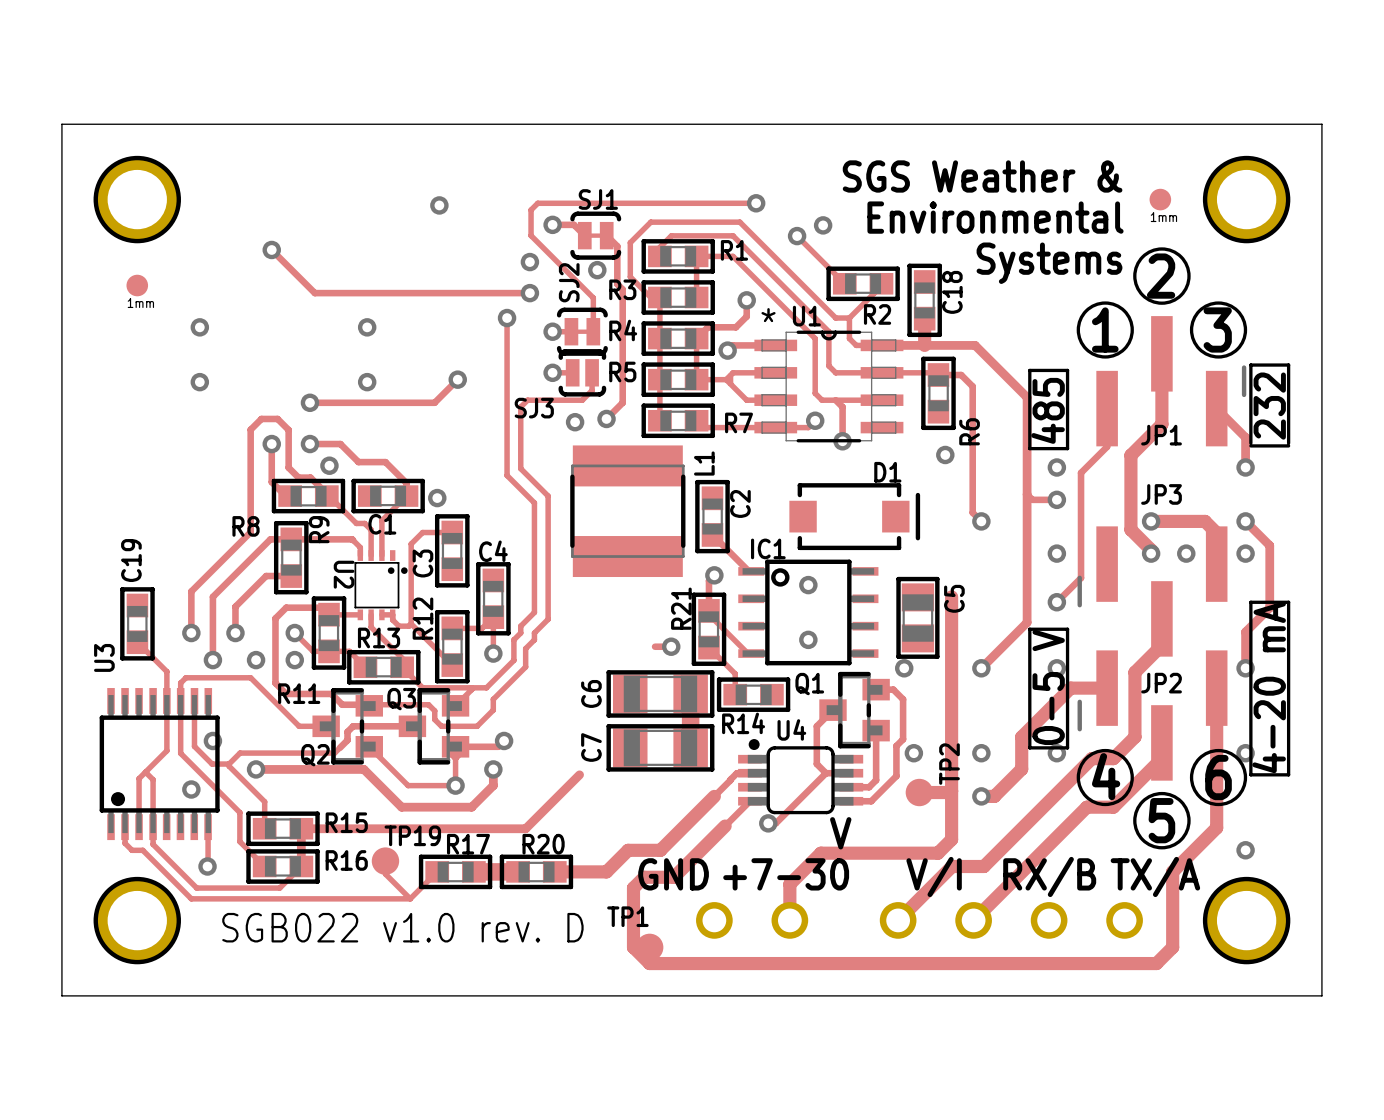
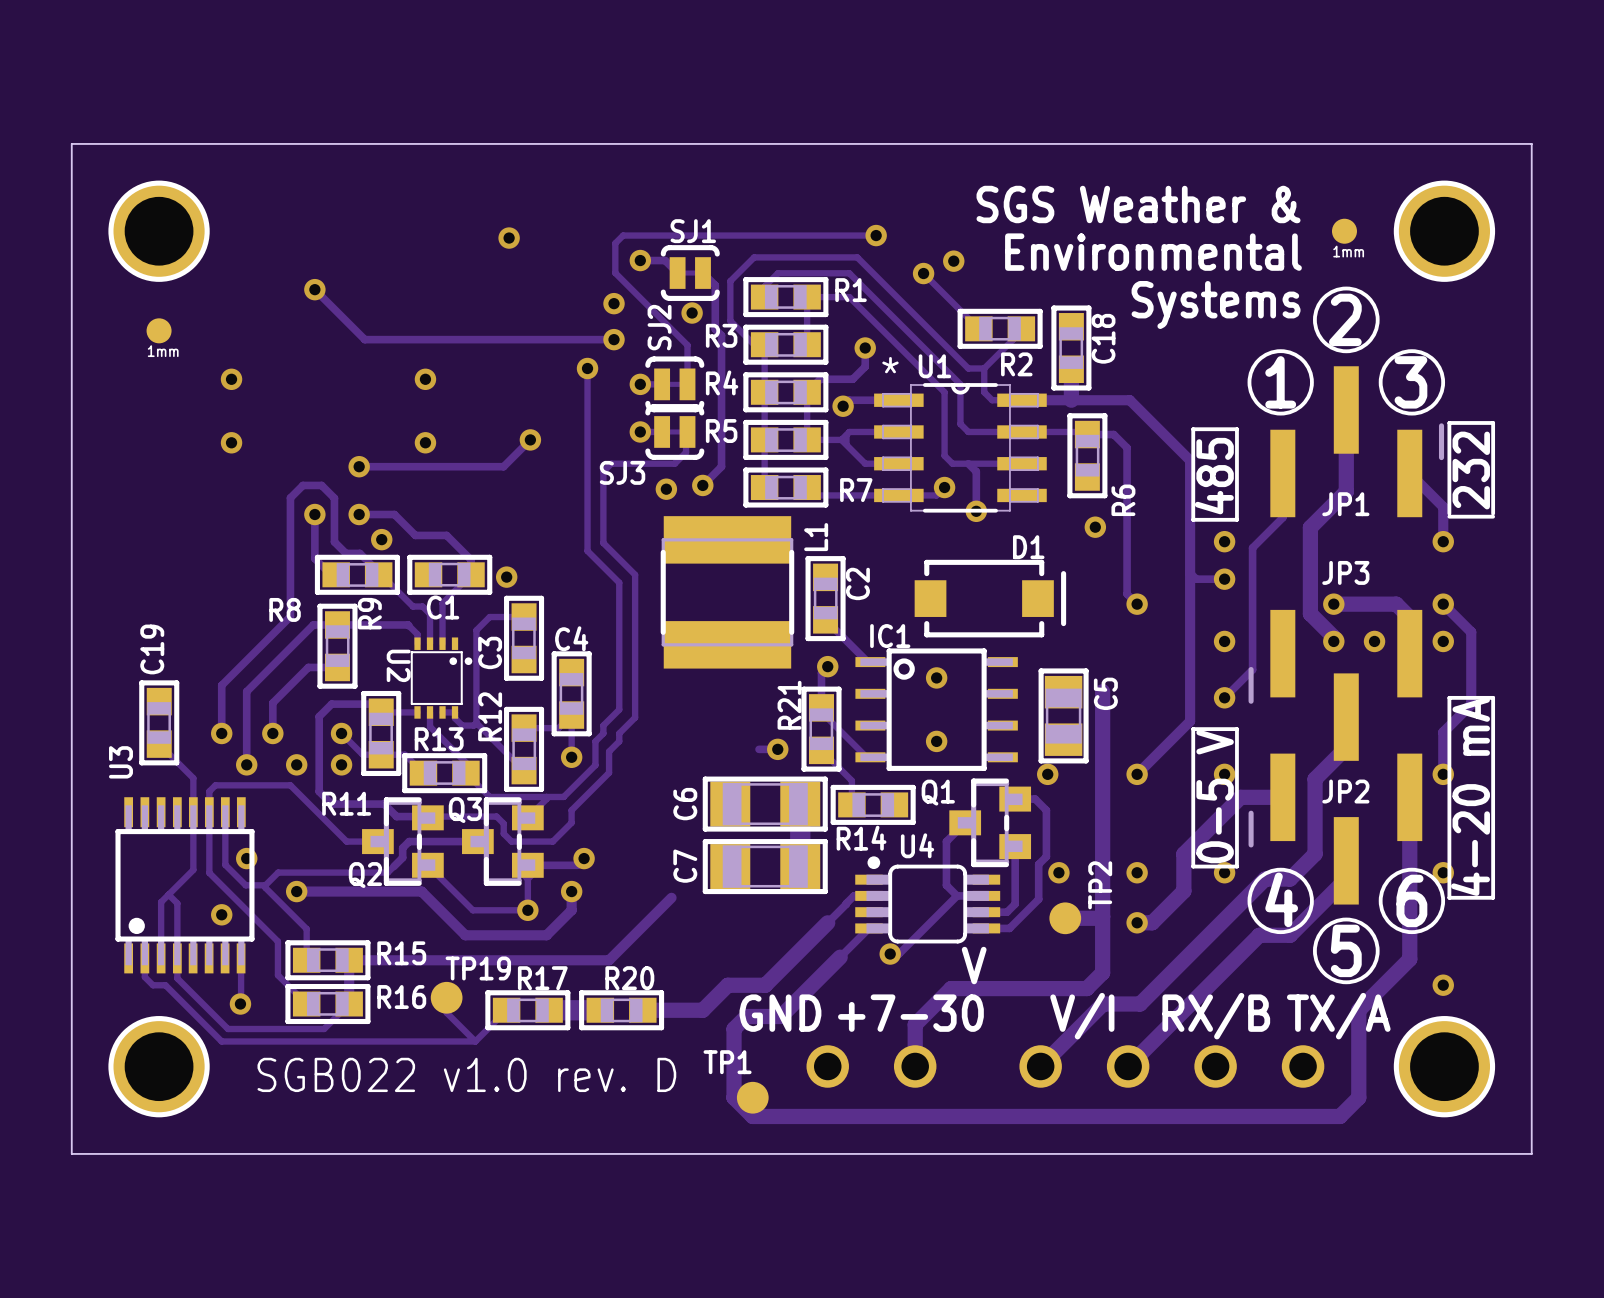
SJ3 footprint: [558, 349, 607, 397] -> [645, 404, 705, 460]

